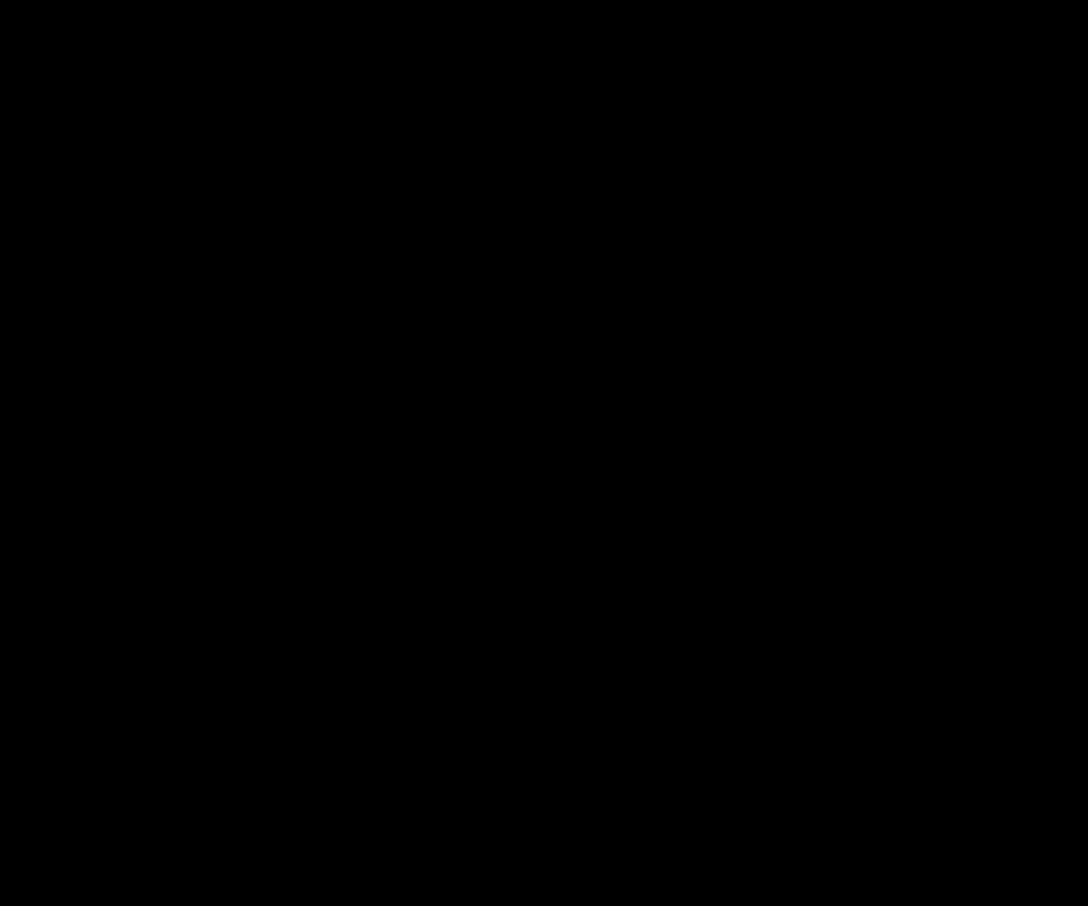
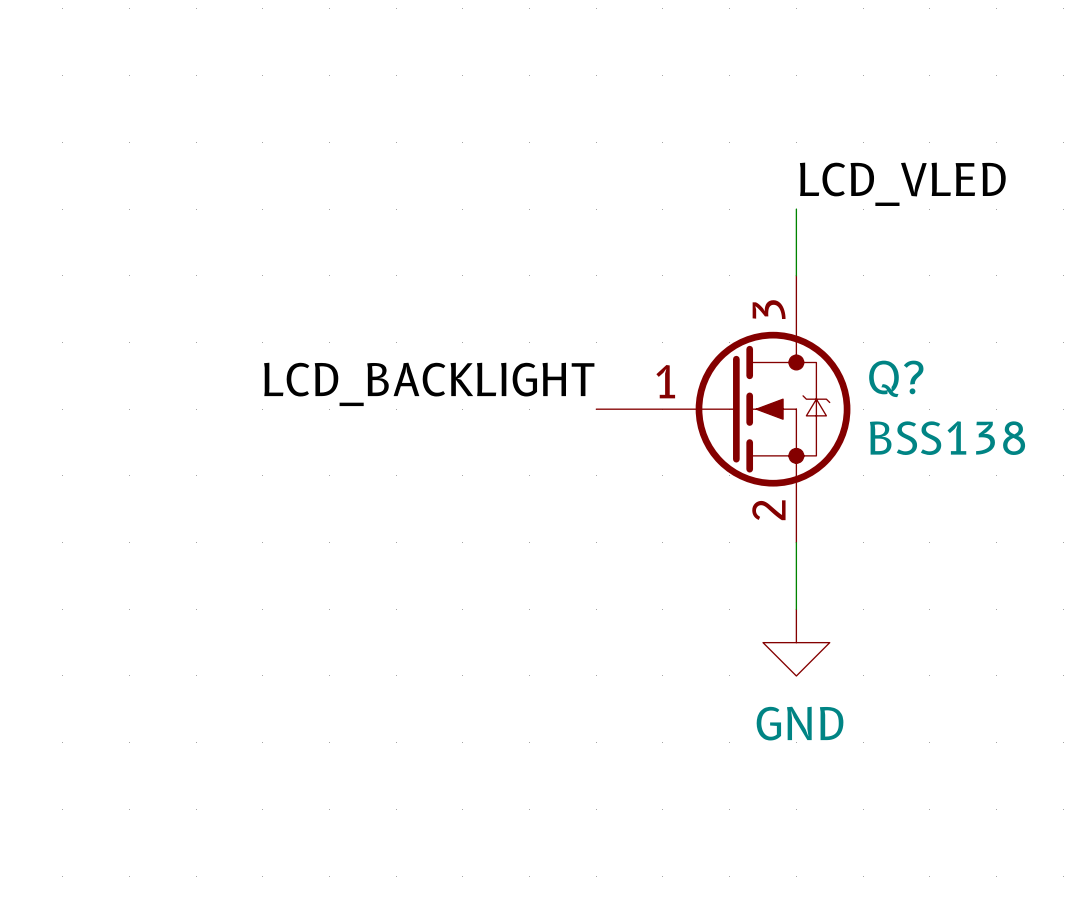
label: none -> LCD_VLED (902, 184)
wire: none -> (796, 209) (796, 275)
label: none -> LCD_BACKLIGHT (429, 384)
Q?: none -> BSS138 (723, 409)
wire: none -> (796, 542) (796, 609)
power symbol: none -> GND (796, 642)

